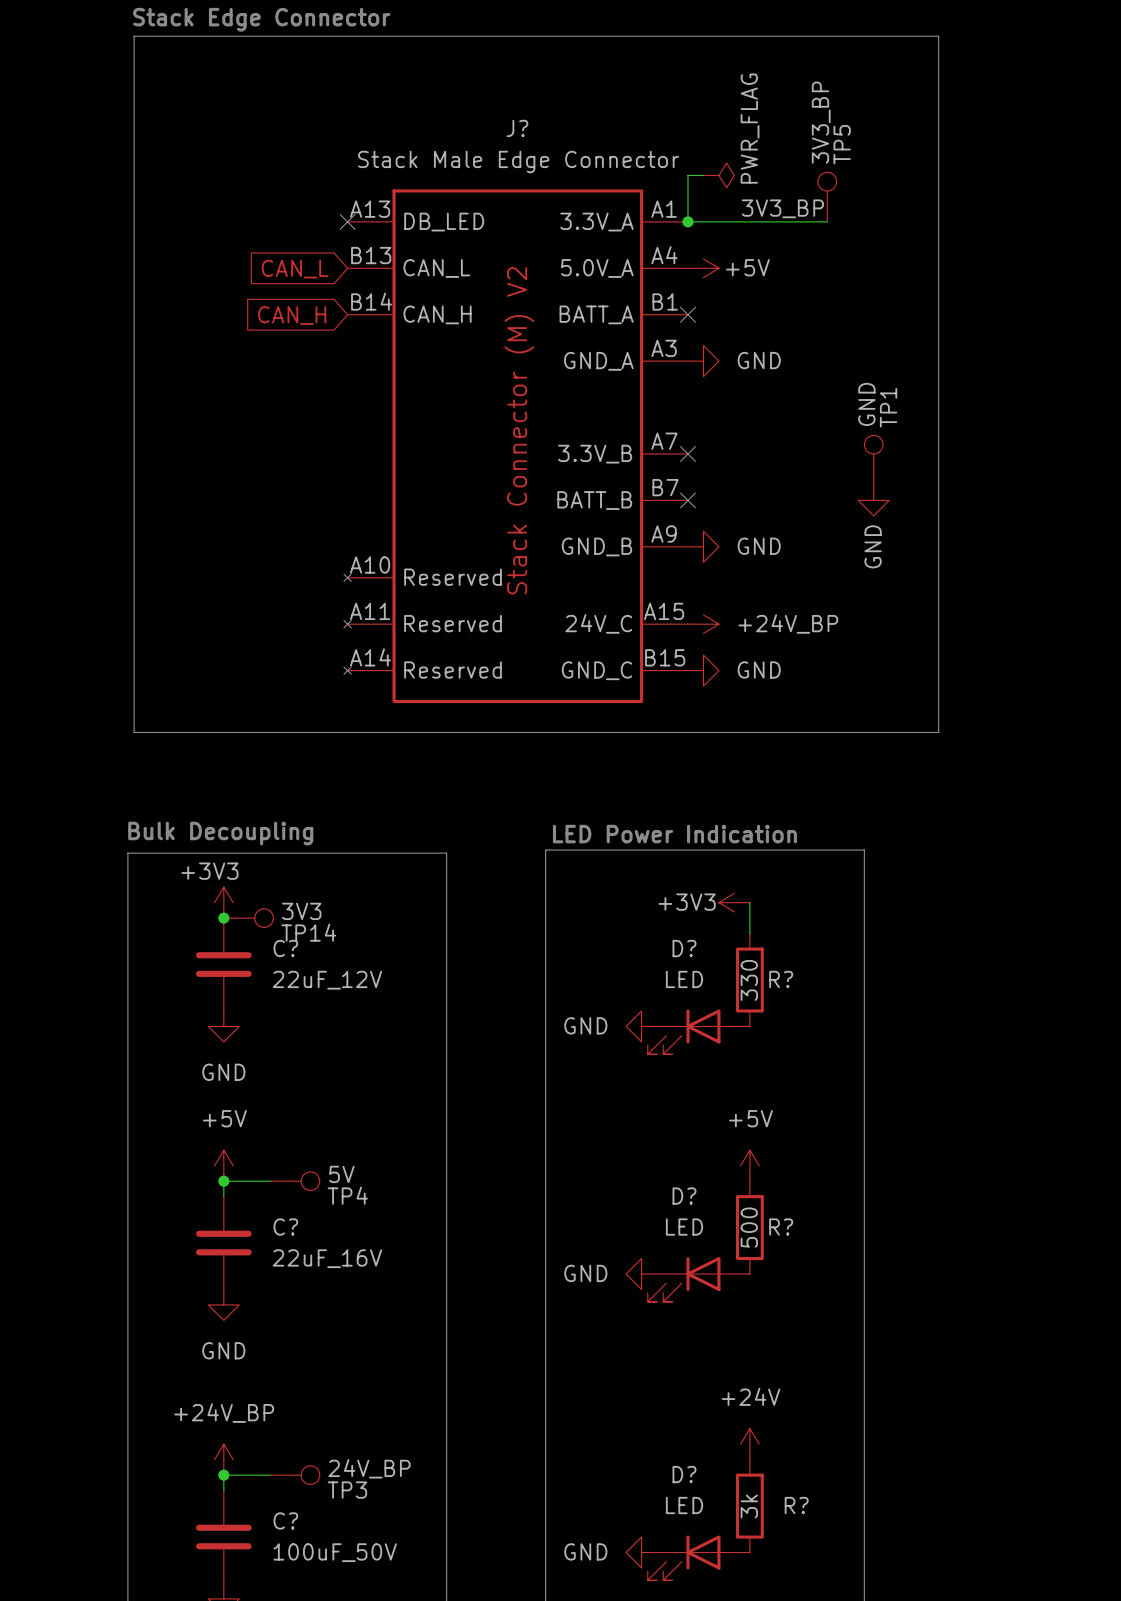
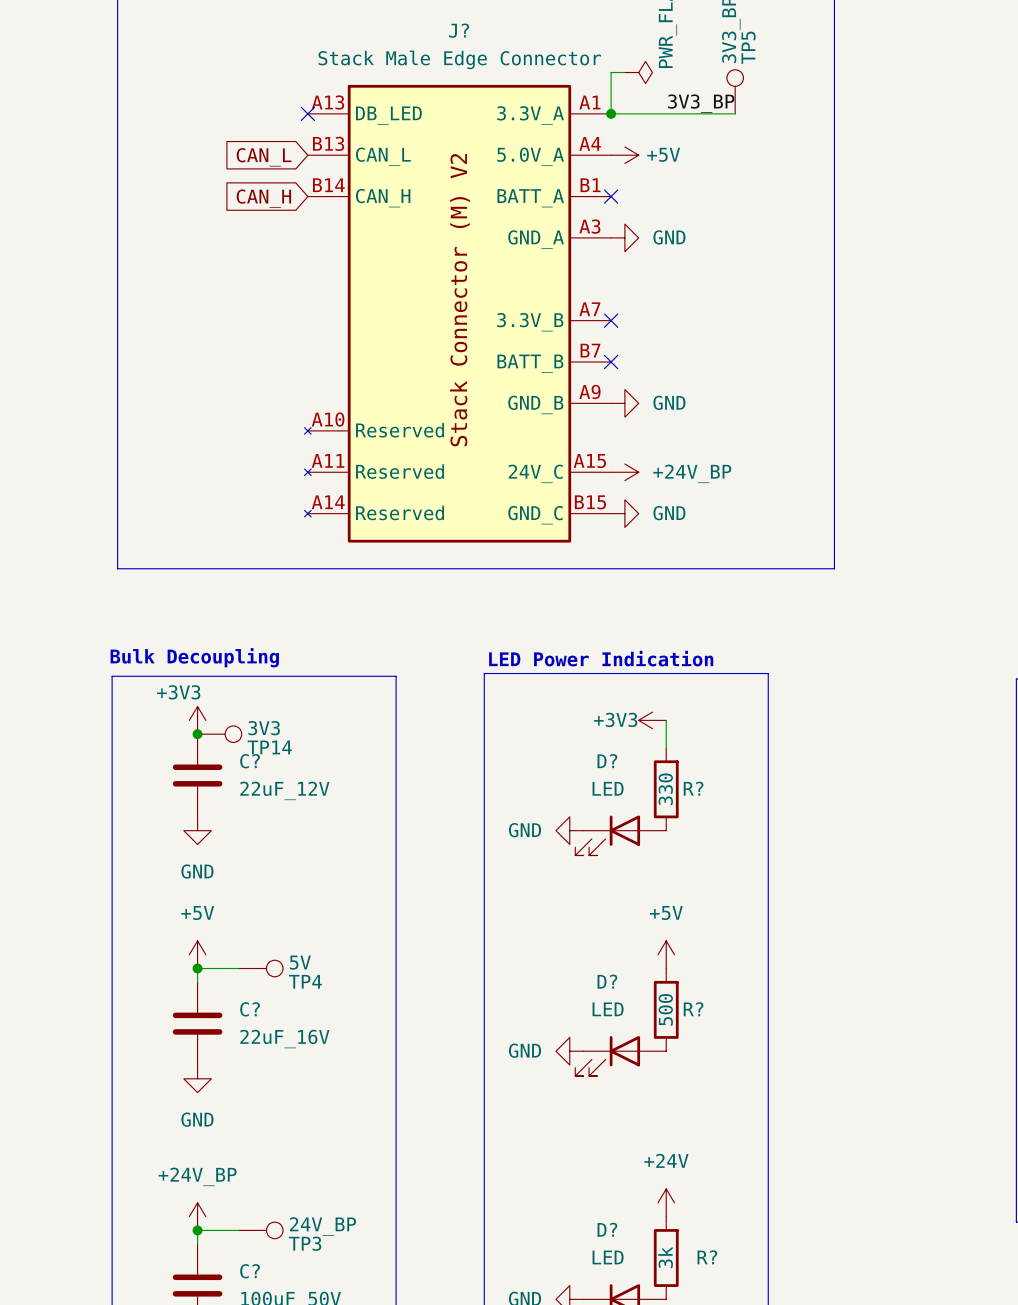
TP1: GND (873, 460) -> none
power symbol: GND (873, 500) -> none

